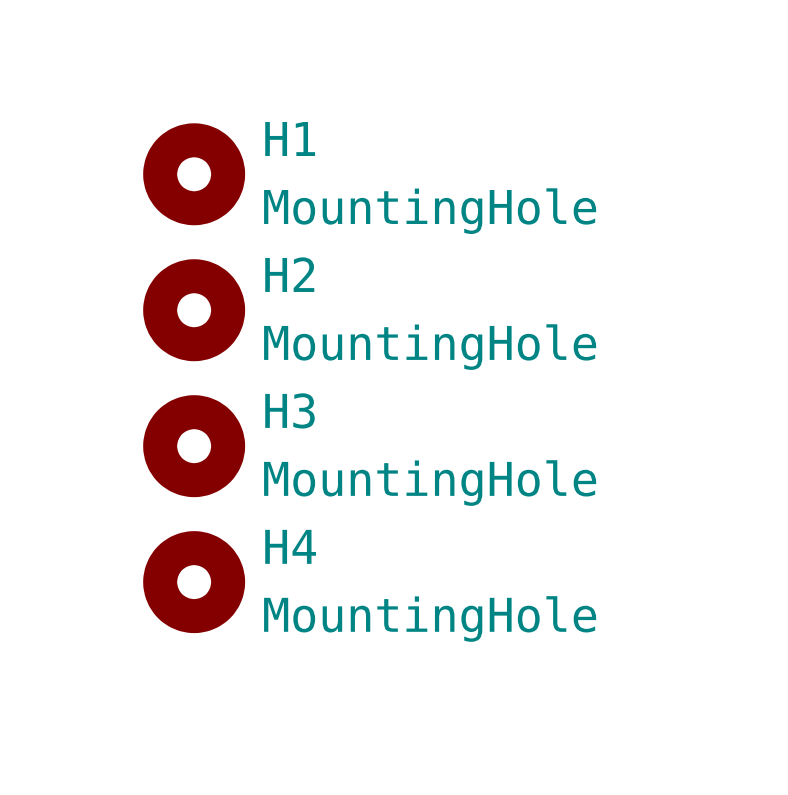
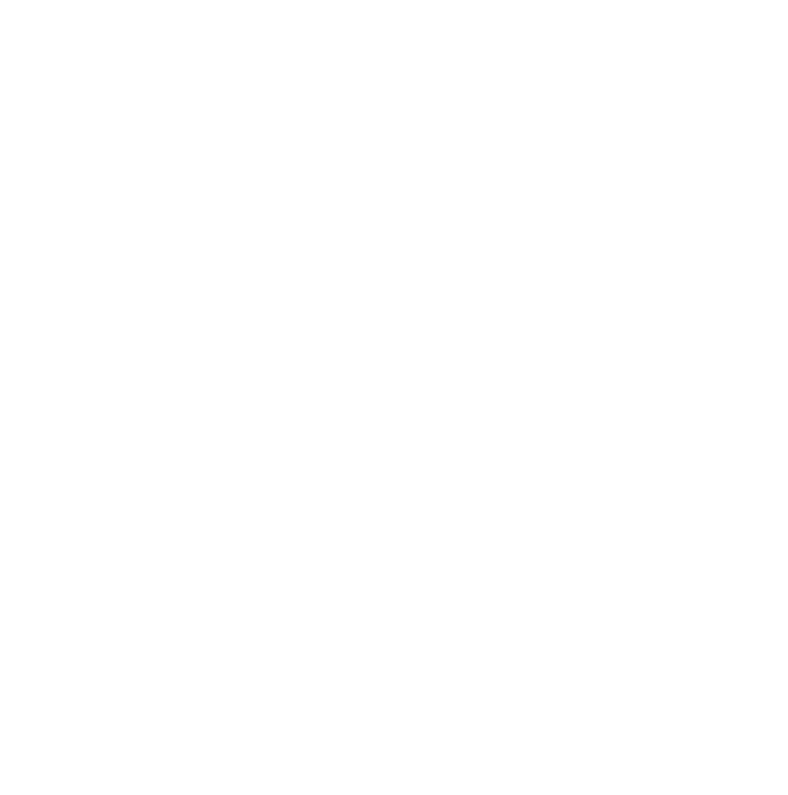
H1: MountingHole (194, 174) -> none
H2: MountingHole (194, 310) -> none
H3: MountingHole (194, 446) -> none
H4: MountingHole (194, 582) -> none

